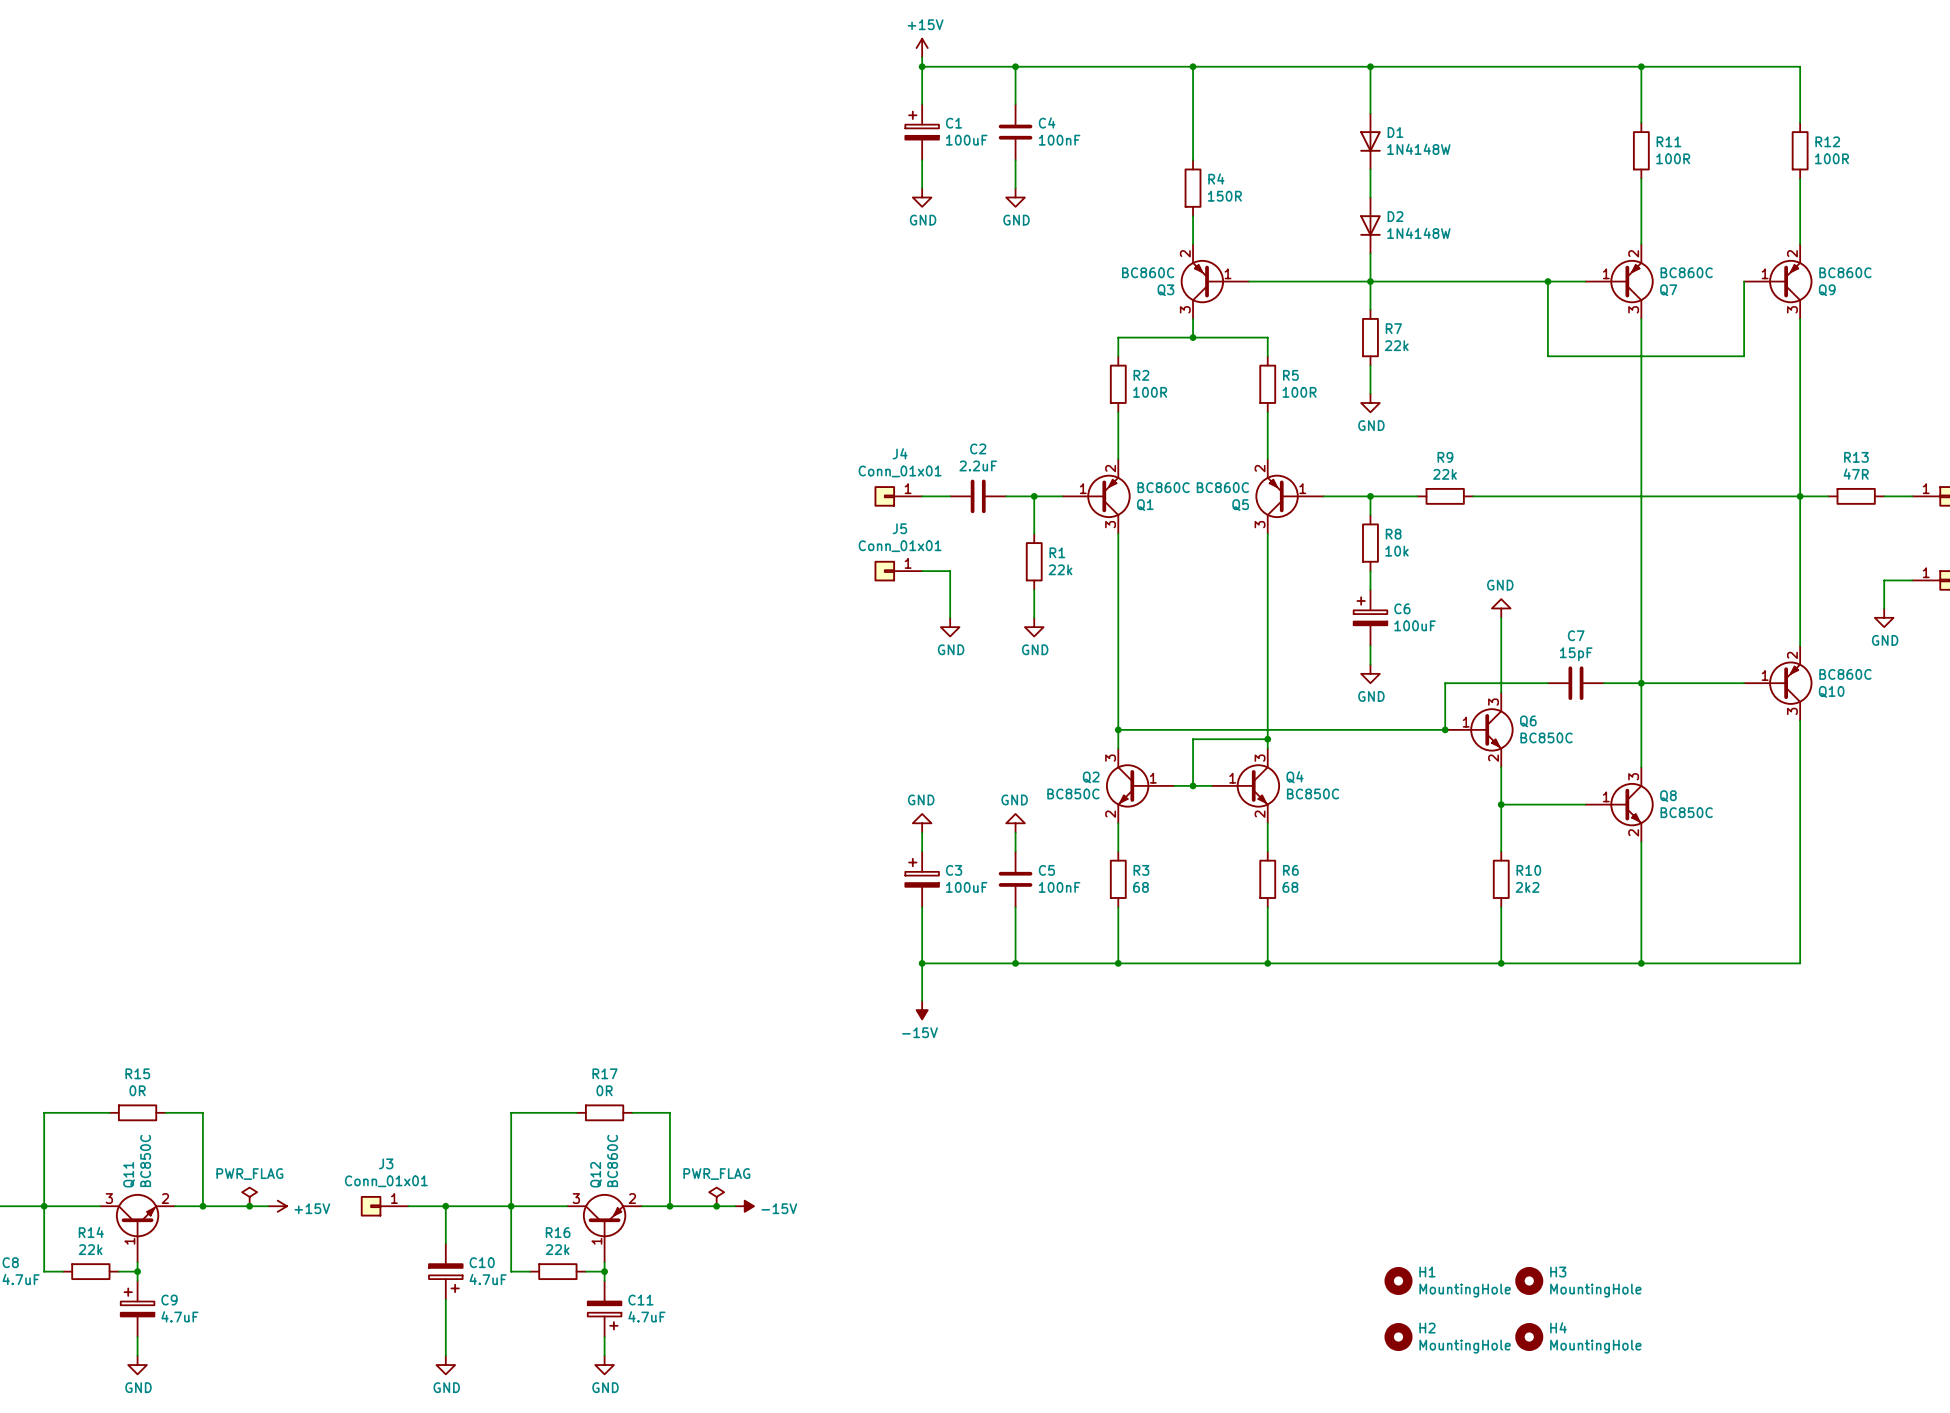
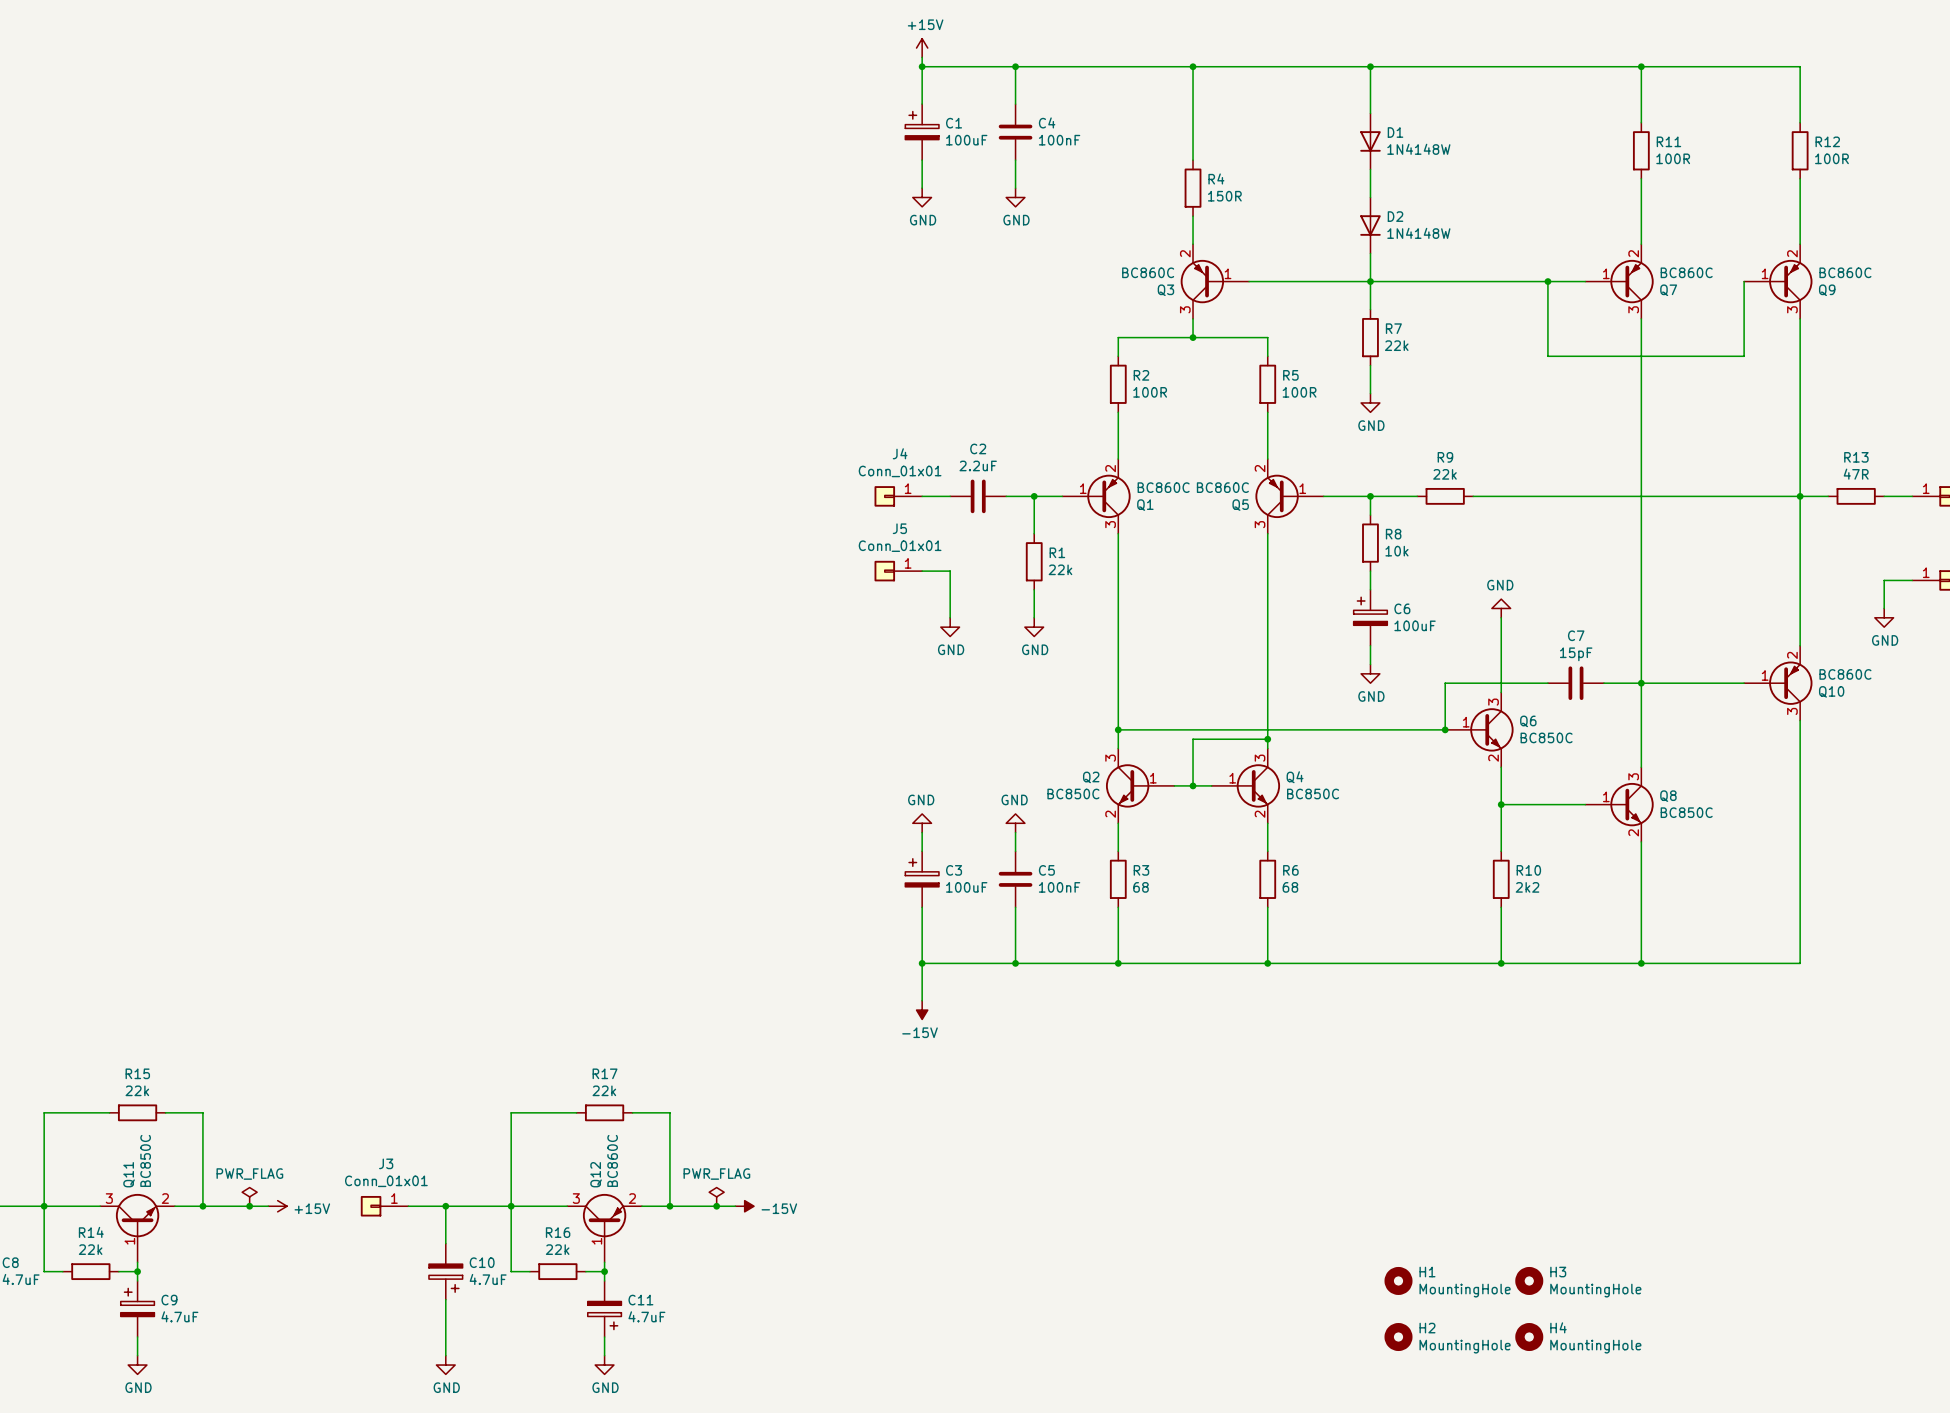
R15 value: 0R (137, 1090) -> 22k (137, 1090)
R17 value: 0R (604, 1090) -> 22k (604, 1090)

